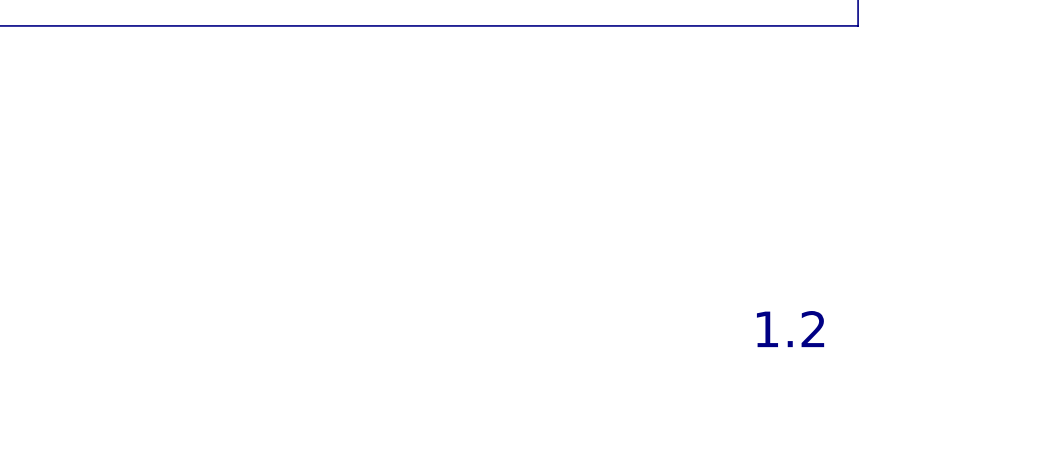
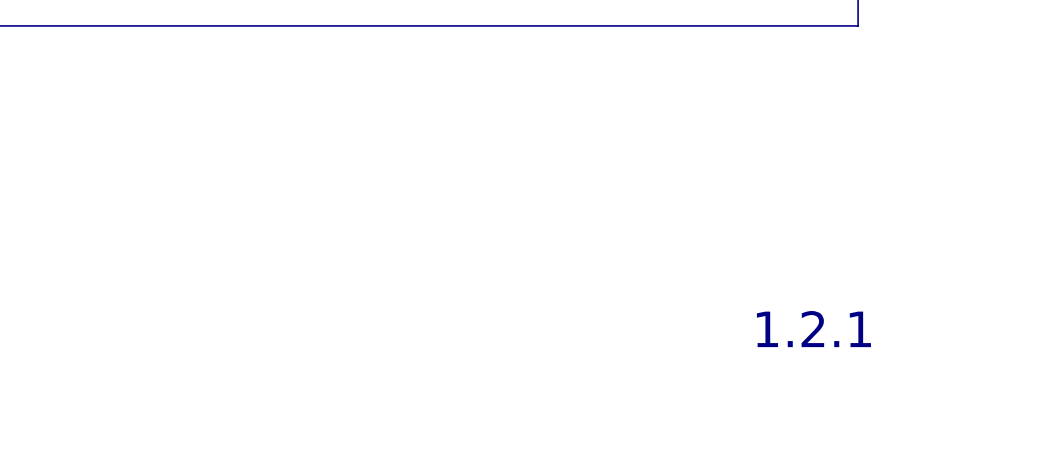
text: 1.2 (790, 329) -> 1.2.1 (813, 329)

